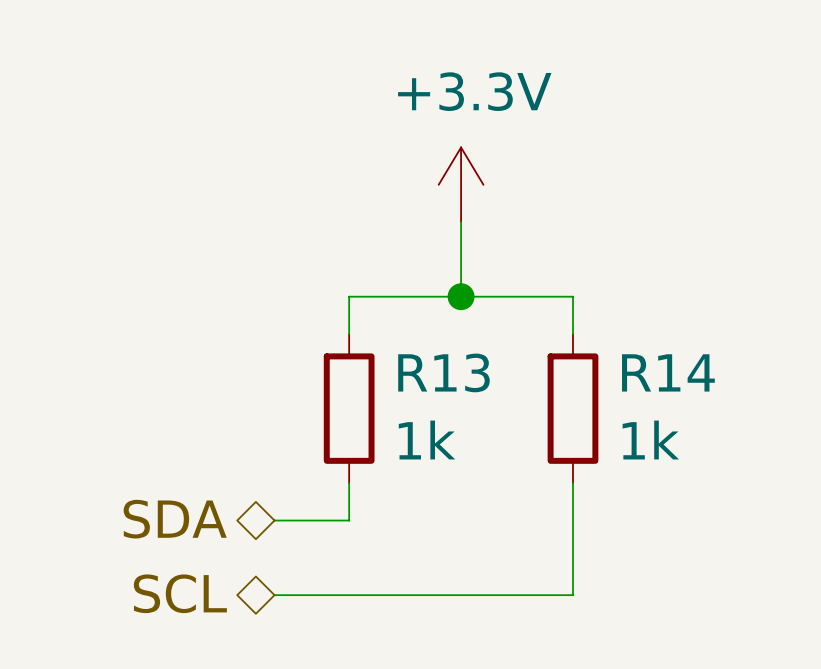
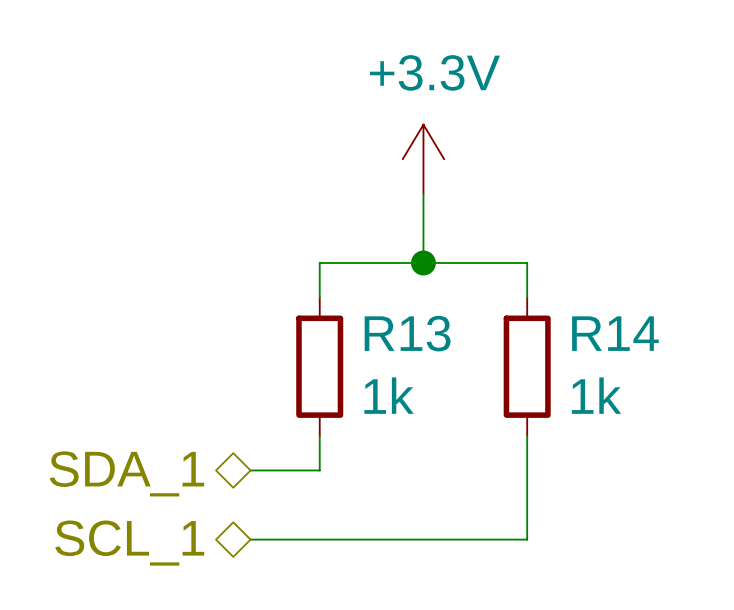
hierarchical label: SDA (175, 519) -> SDA_1 (126, 473)
hierarchical label: SCL (180, 593) -> SCL_1 (129, 543)

